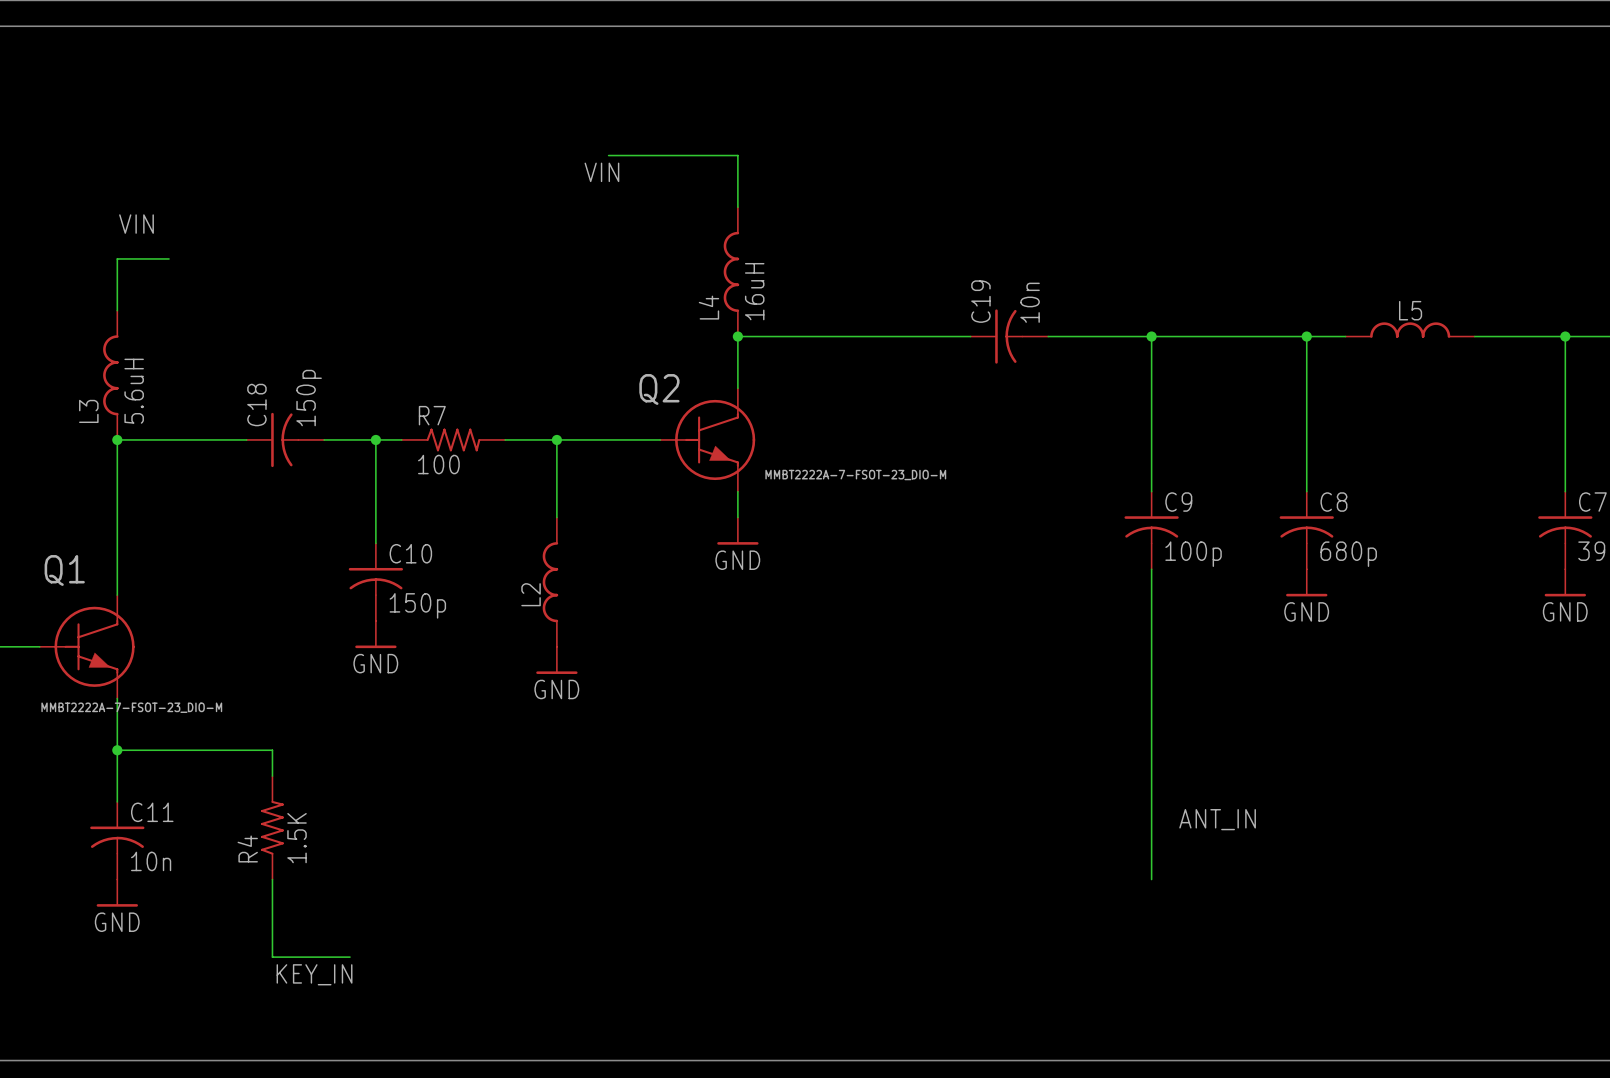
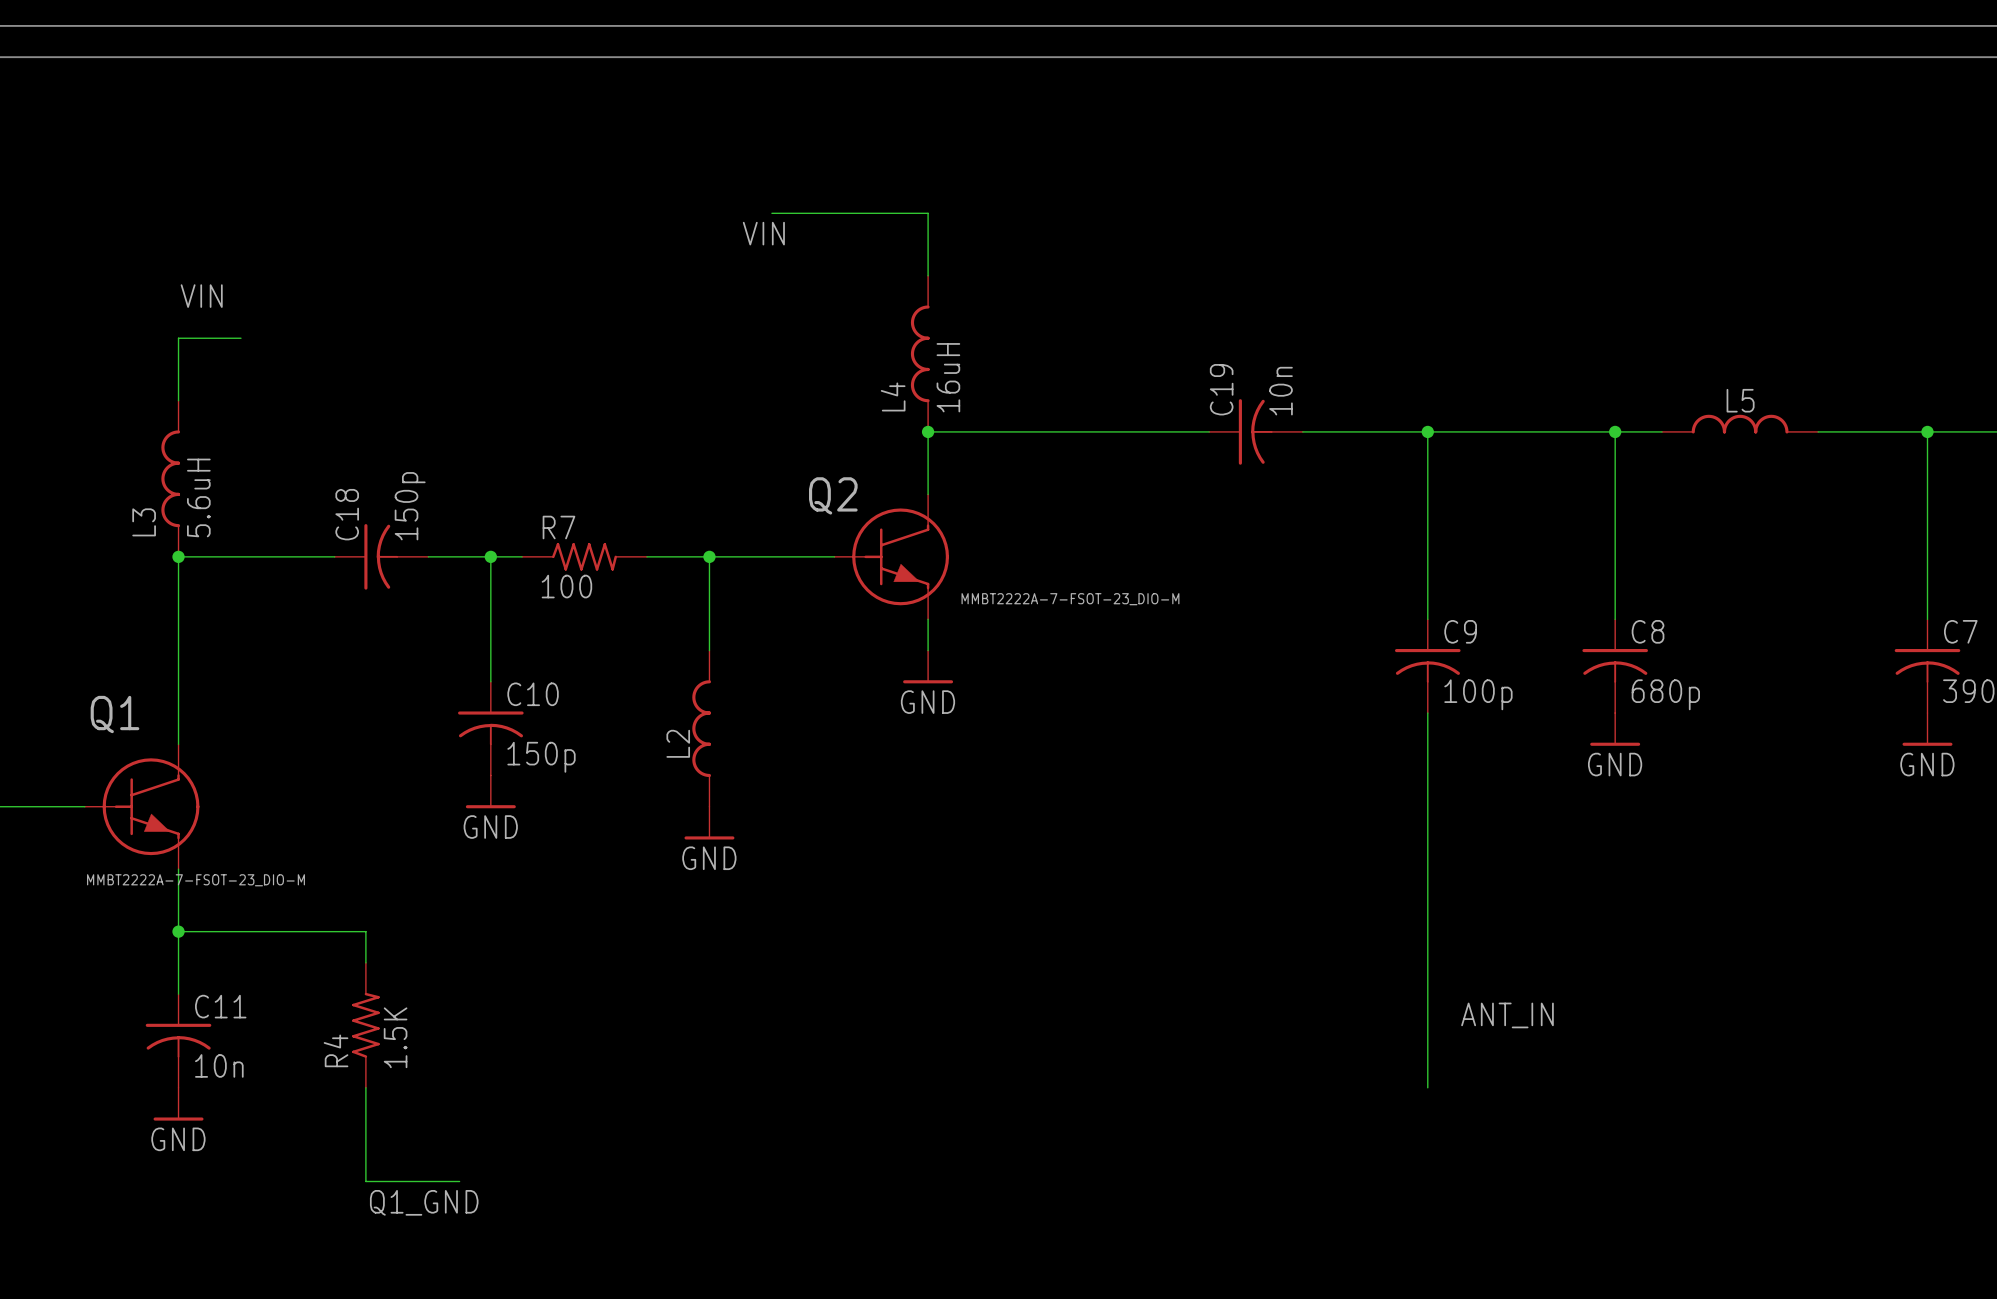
label: KEY_IN (314, 974) -> Q1_GND (424, 1202)

